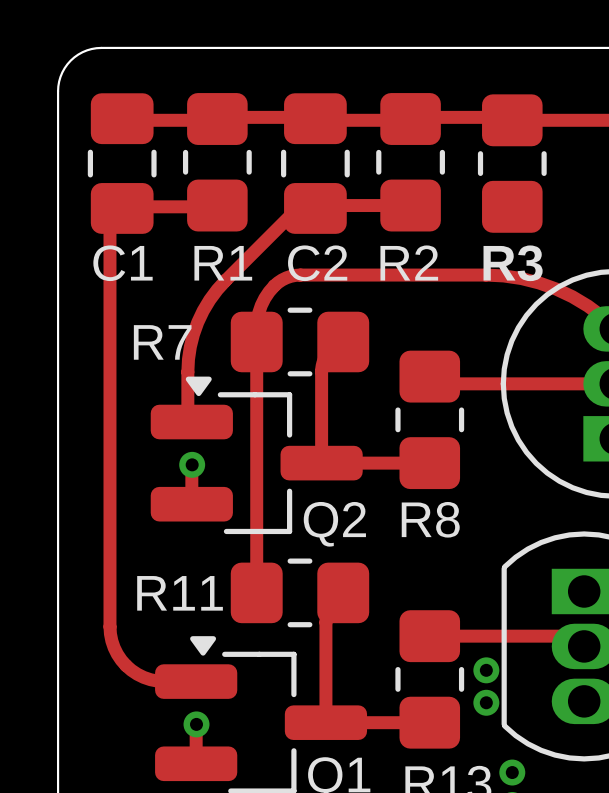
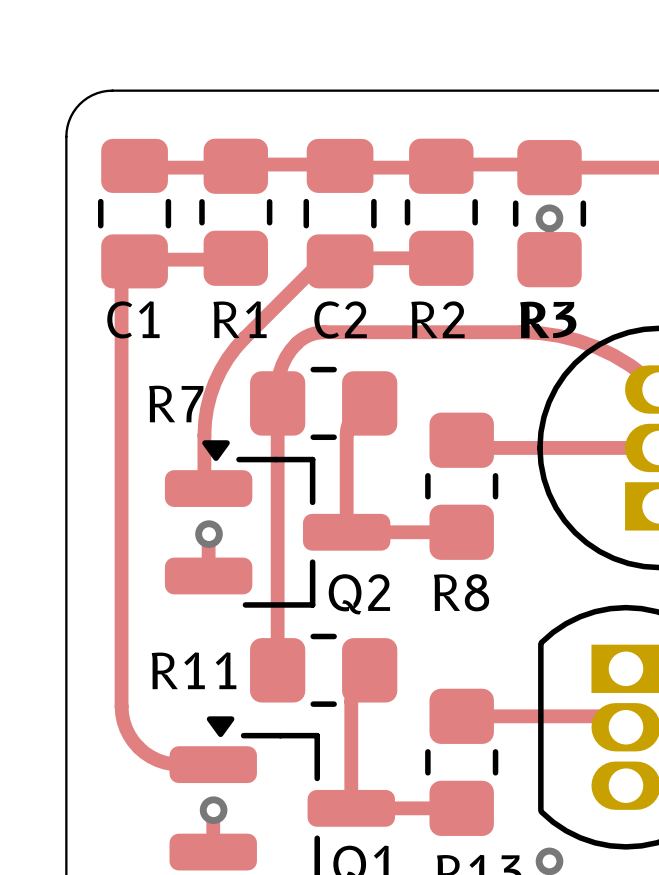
via: none -> (549, 218)
via: (486, 670) -> none
via: (486, 702) -> none

